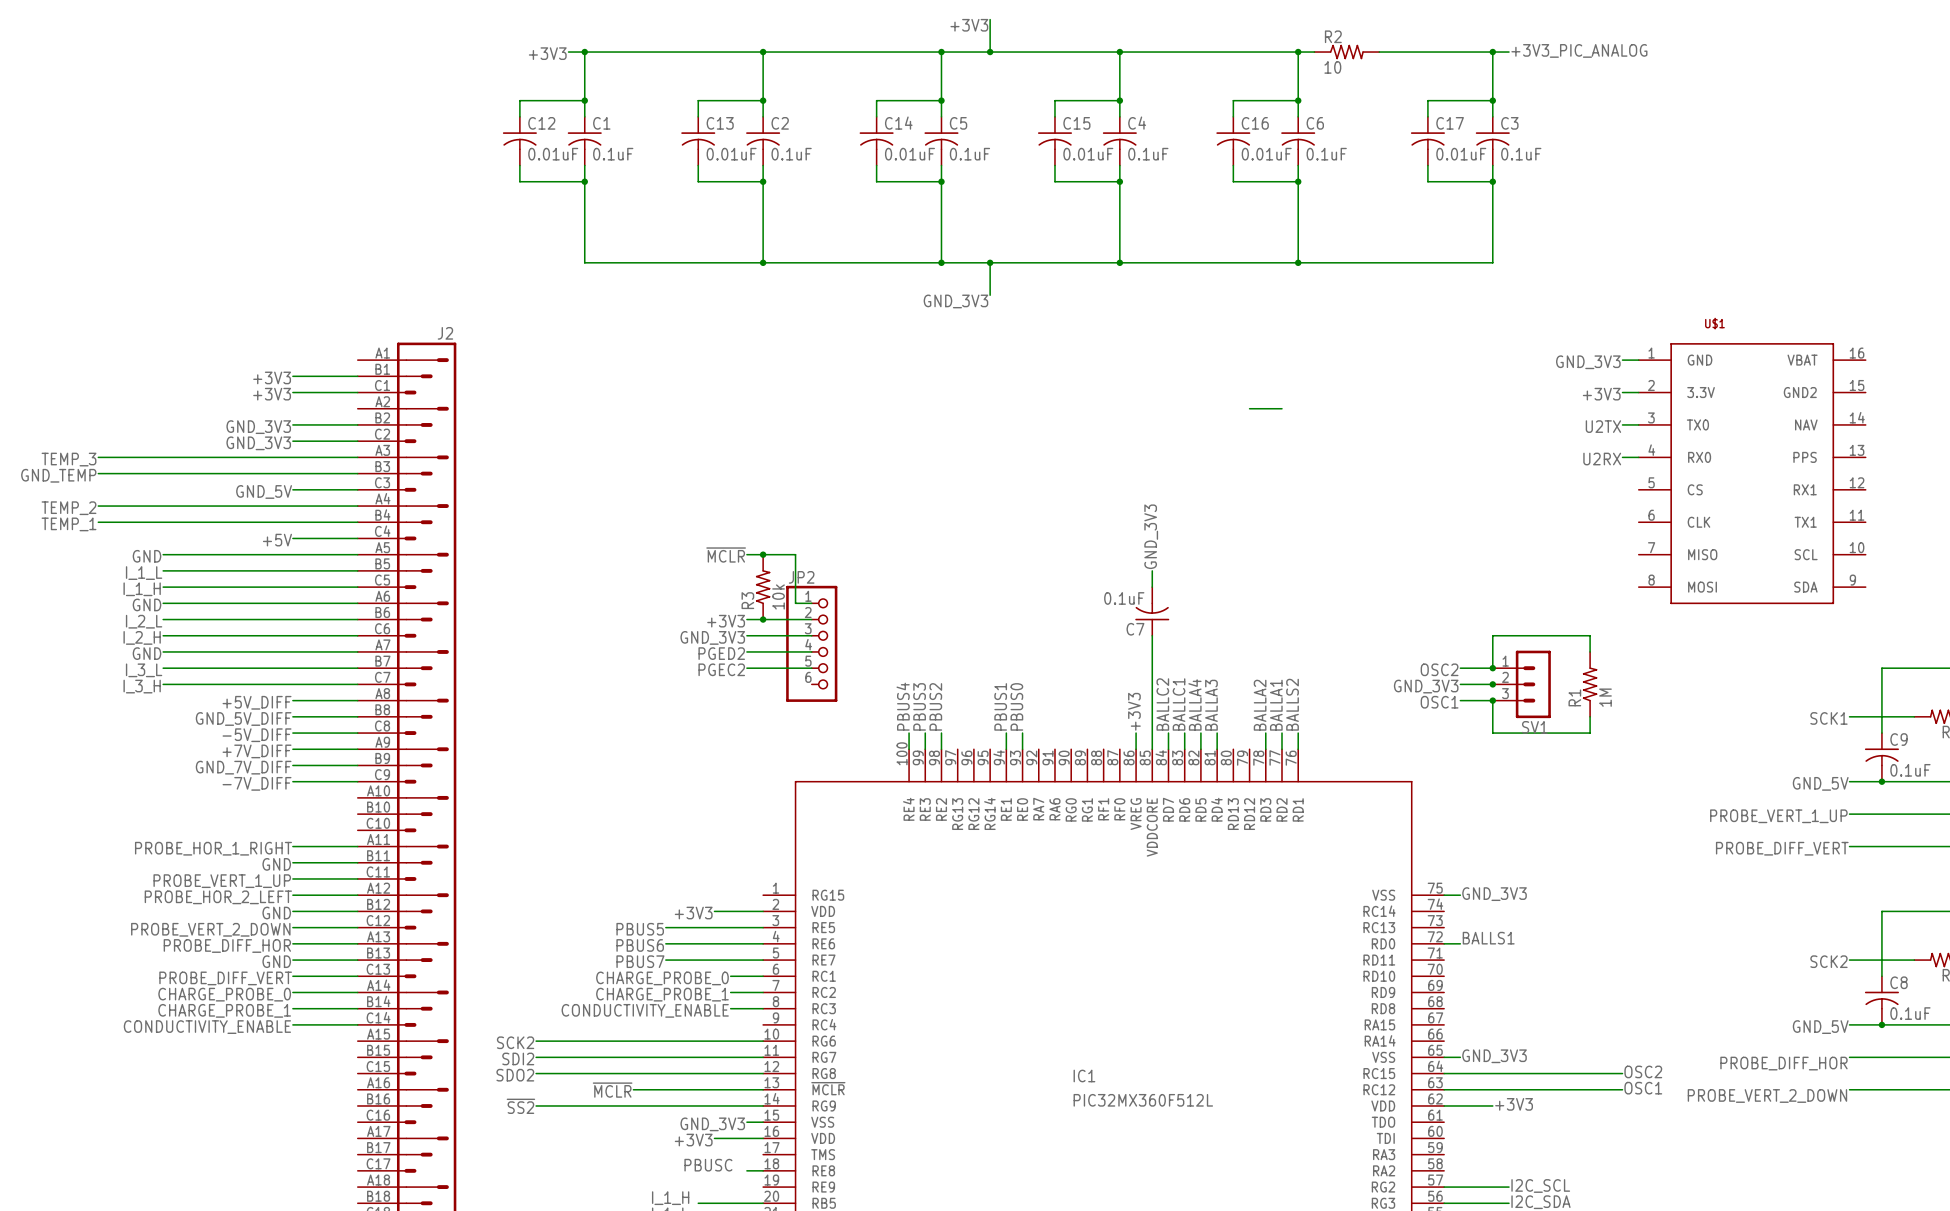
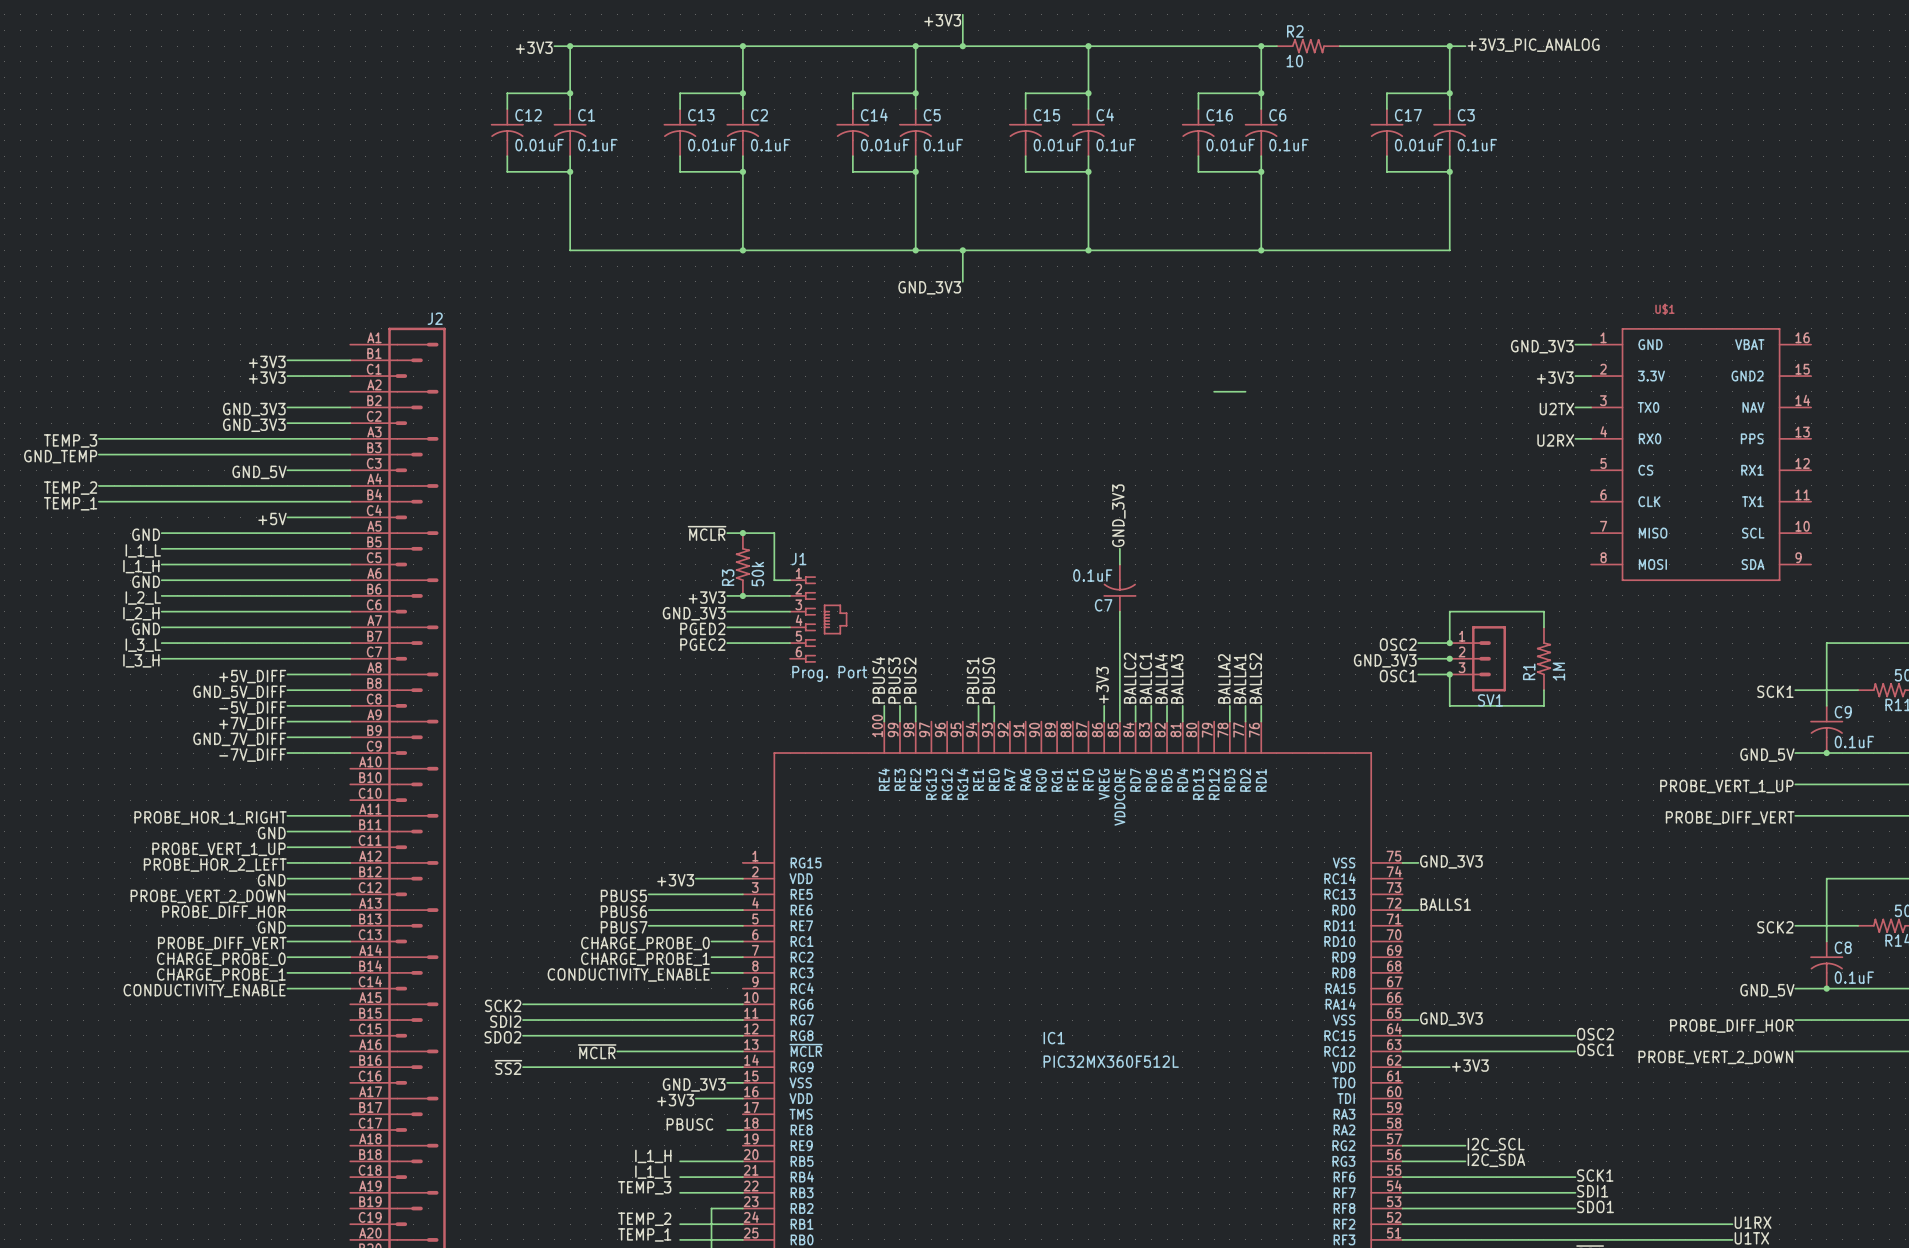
R3 value: 10k (778, 596) -> 50k (757, 574)
JP2: (811, 643) -> none
J1: none -> Prog. Port (818, 619)

